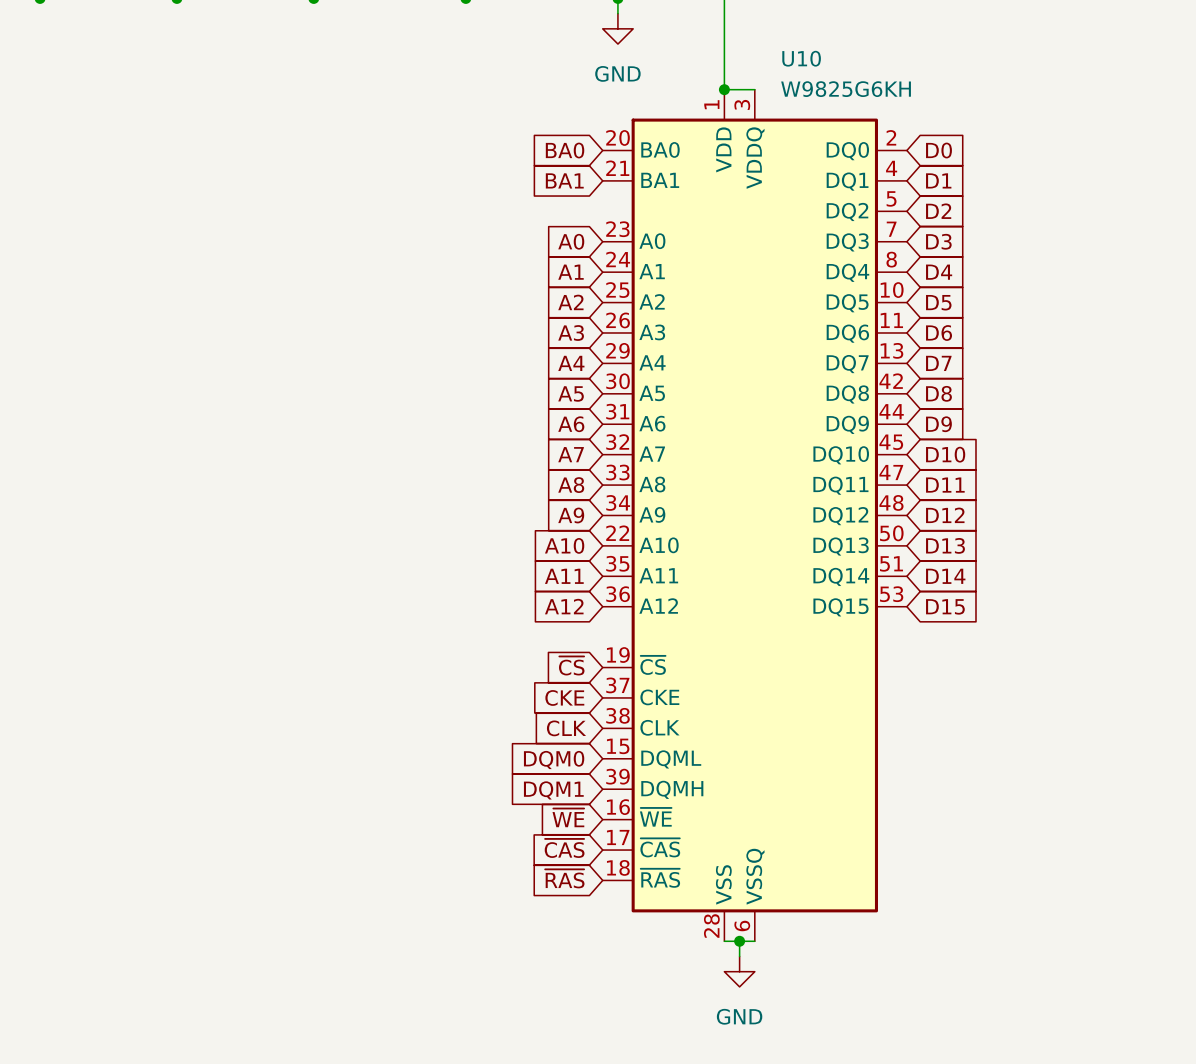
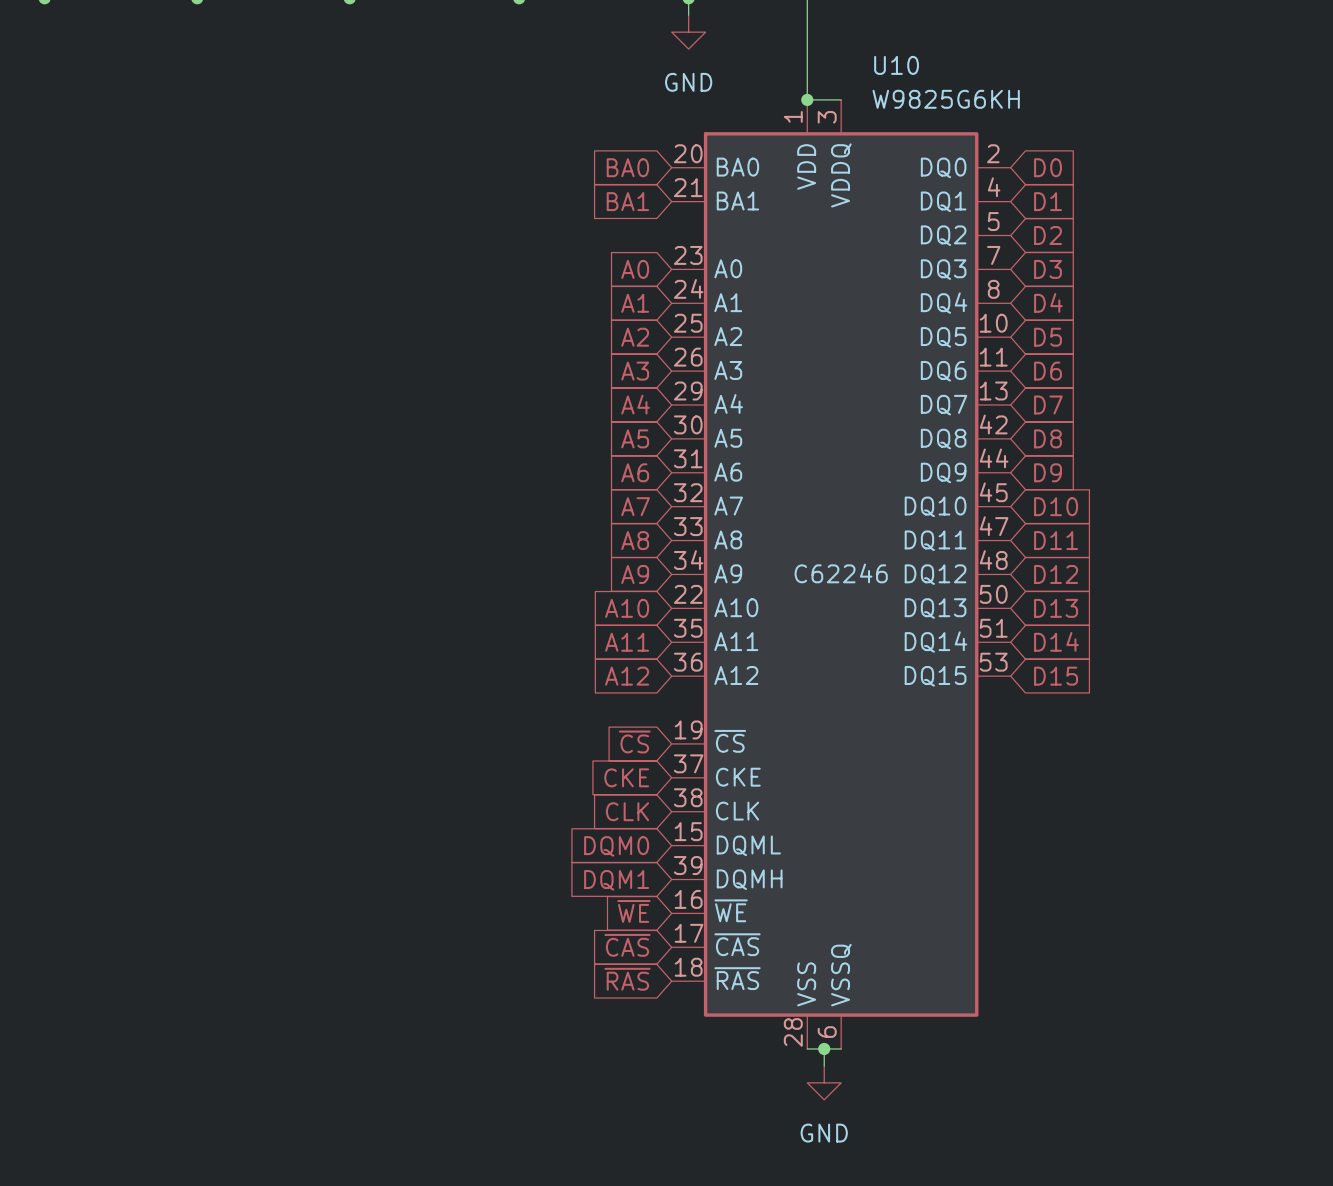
U10 text: none -> C62246 (841, 573)

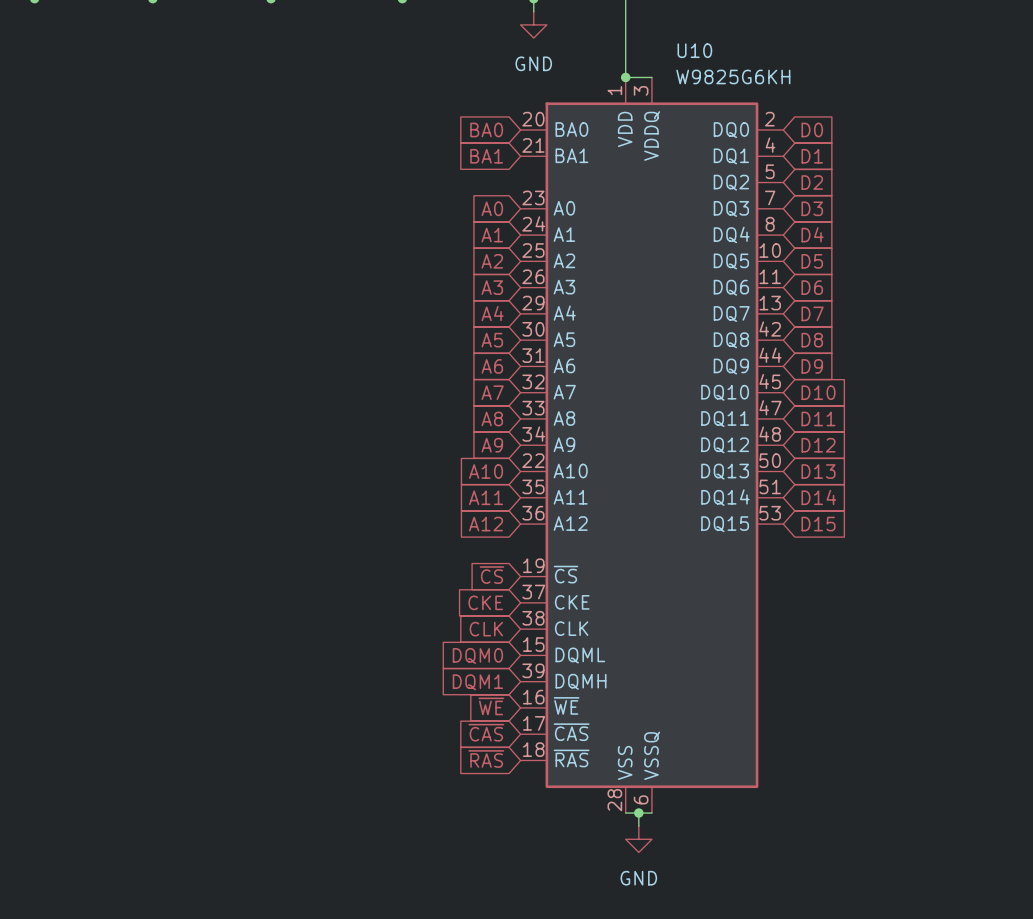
U10 text: C62246 (841, 573) -> none

